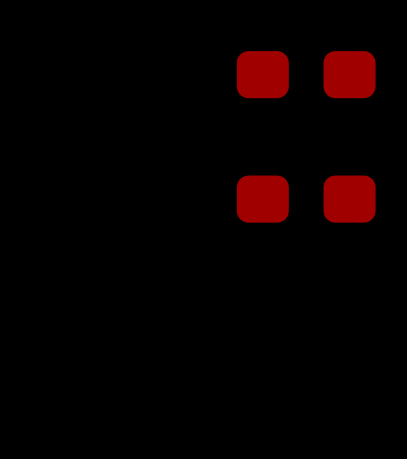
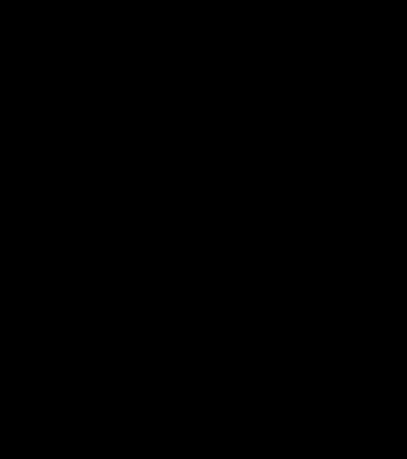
part: (306, 74) -> none
part: (306, 199) -> none

